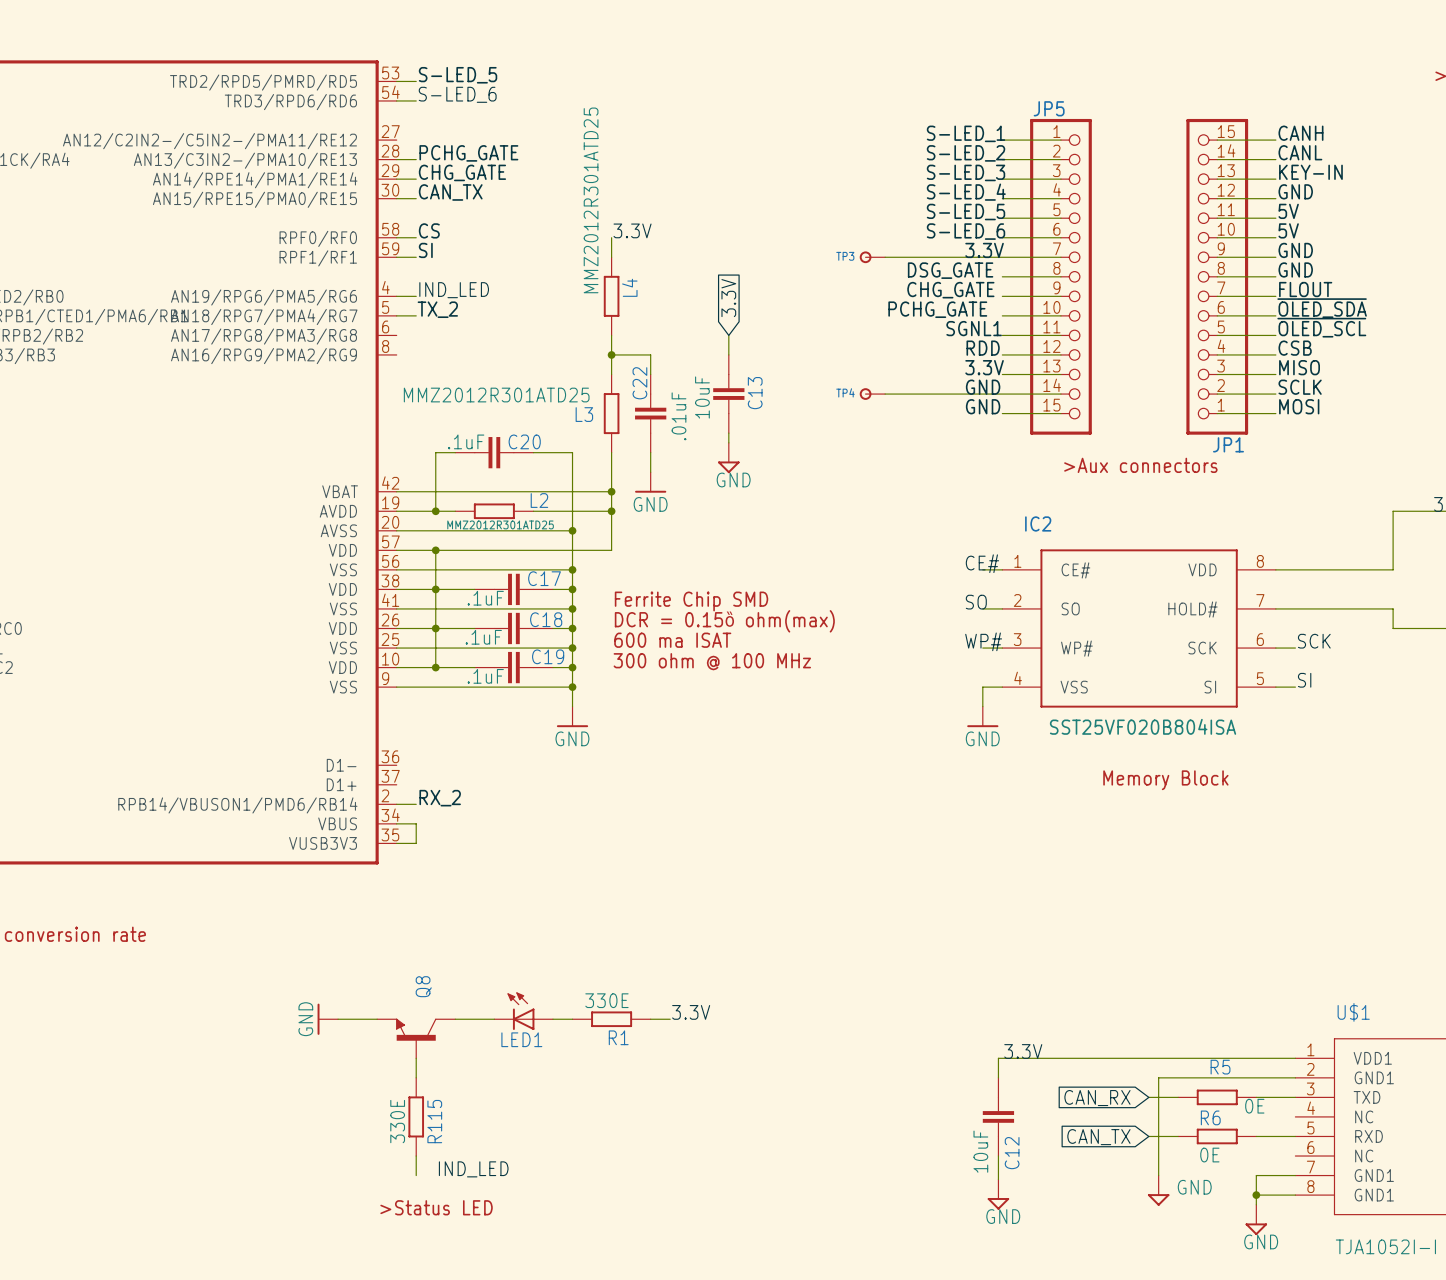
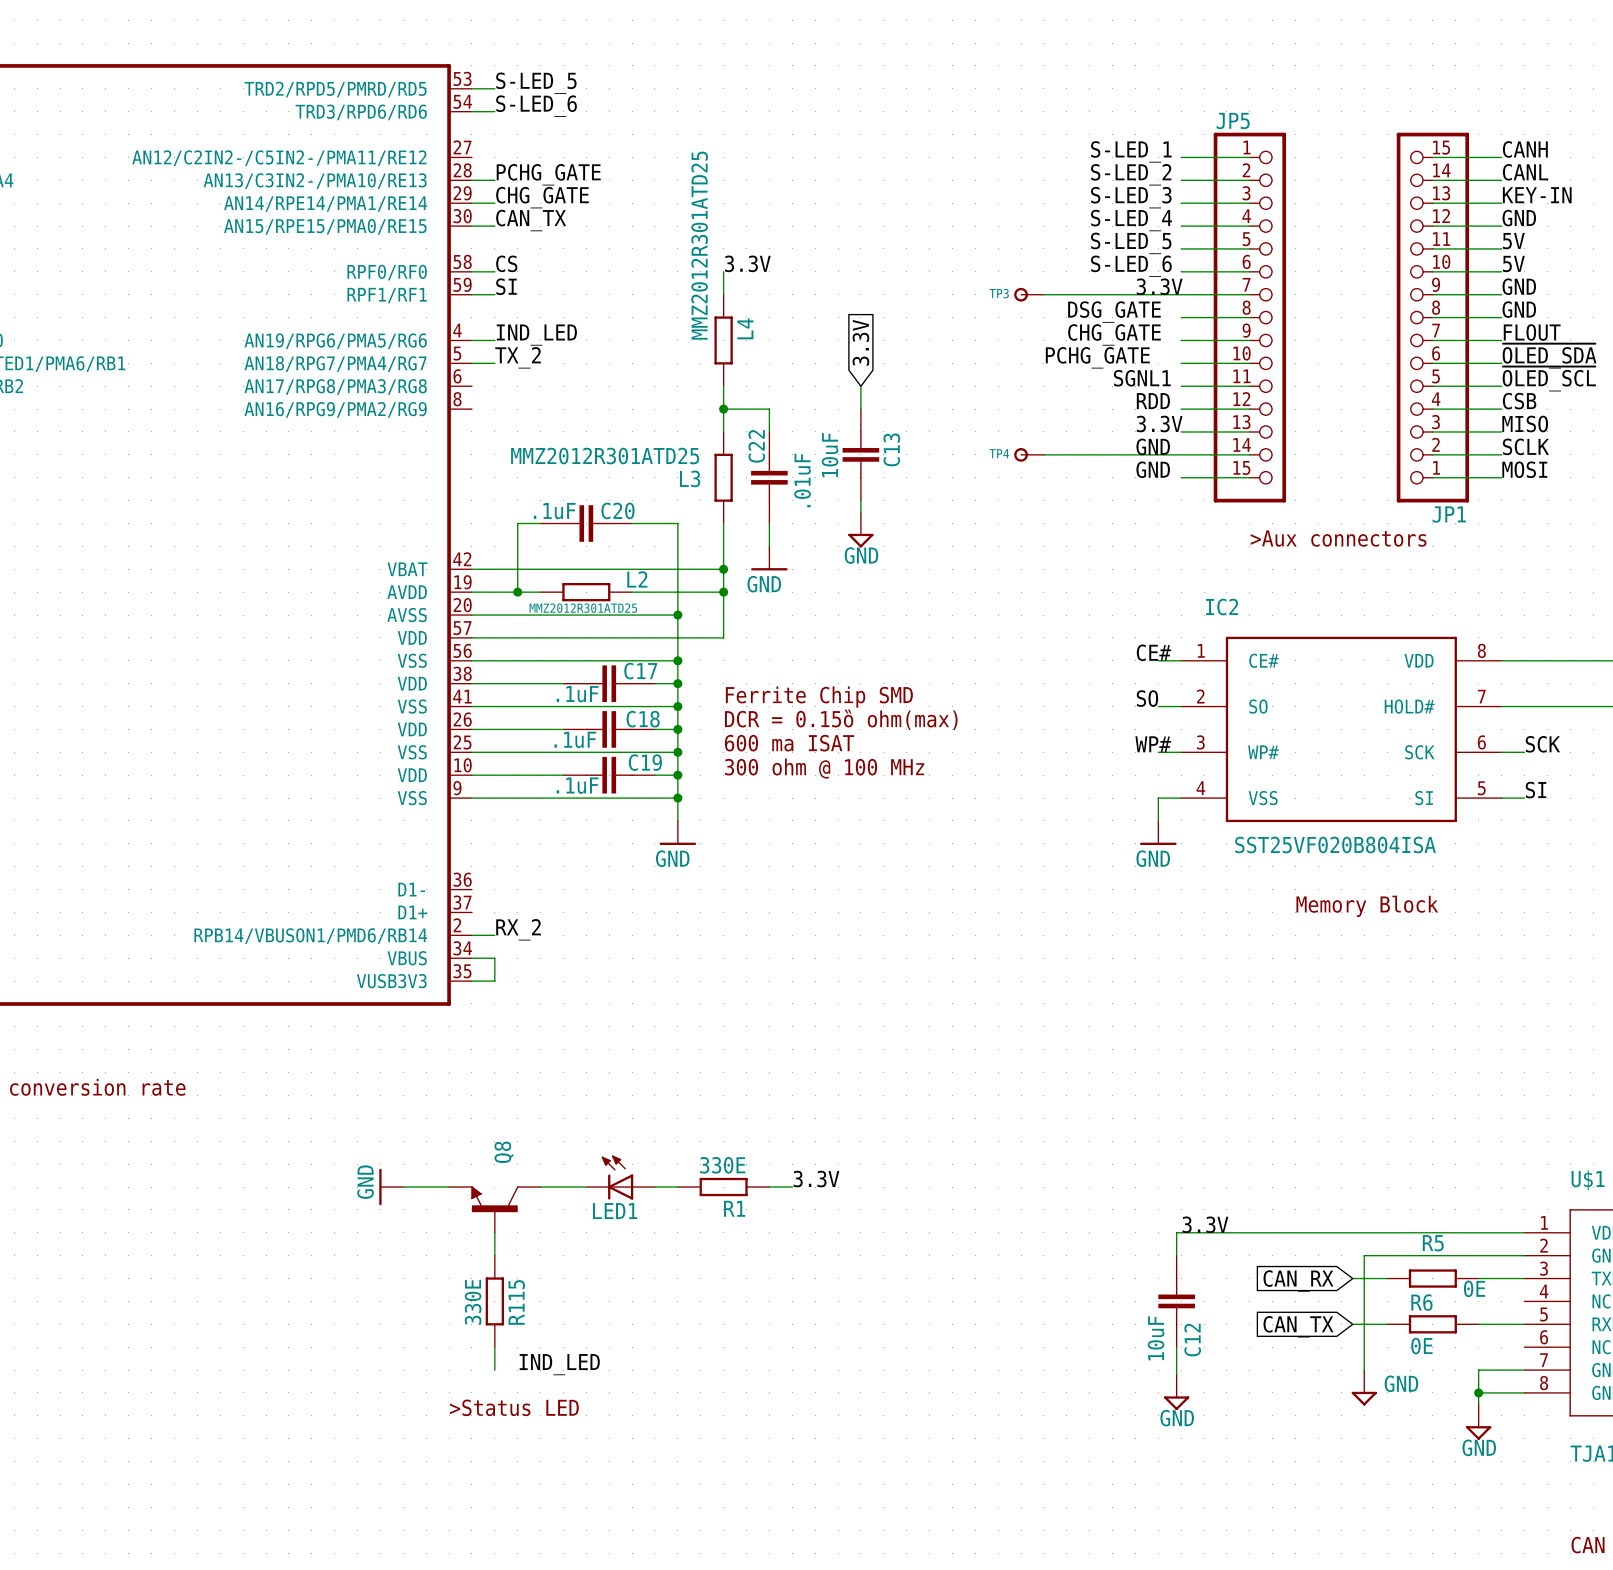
wire: (435, 550) (435, 667) -> none
junction: (435, 550) -> none
junction: (435, 589) -> none
junction: (435, 628) -> none
junction: (435, 667) -> none

